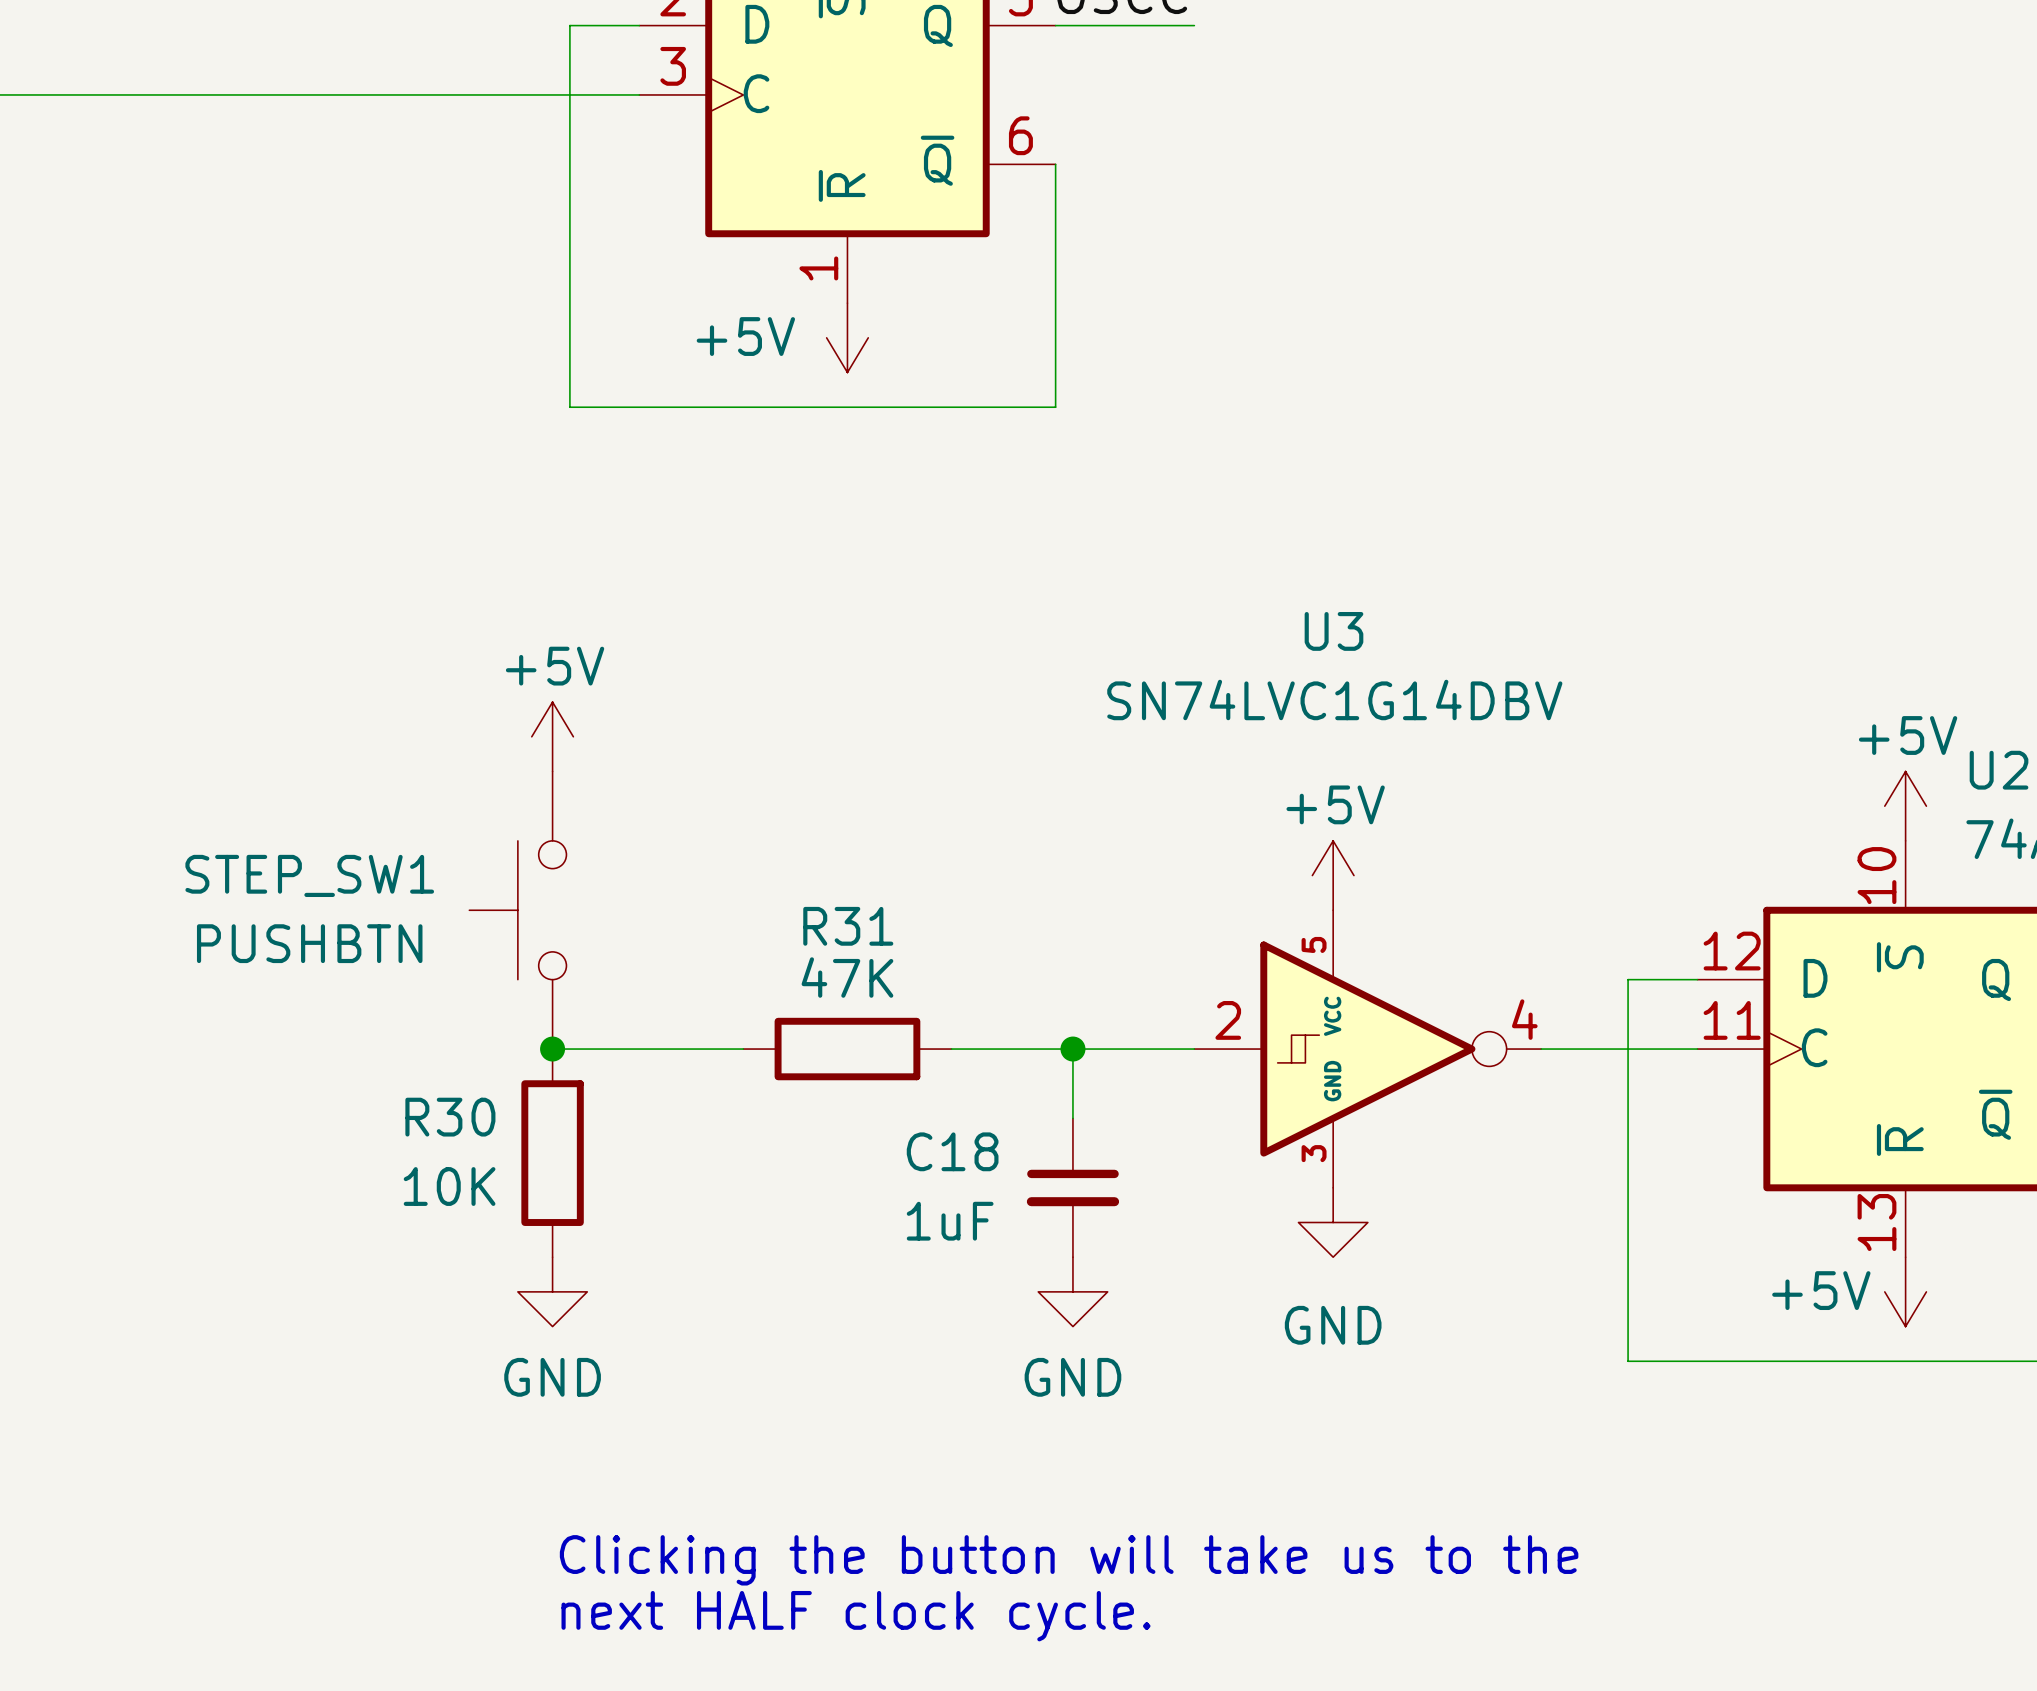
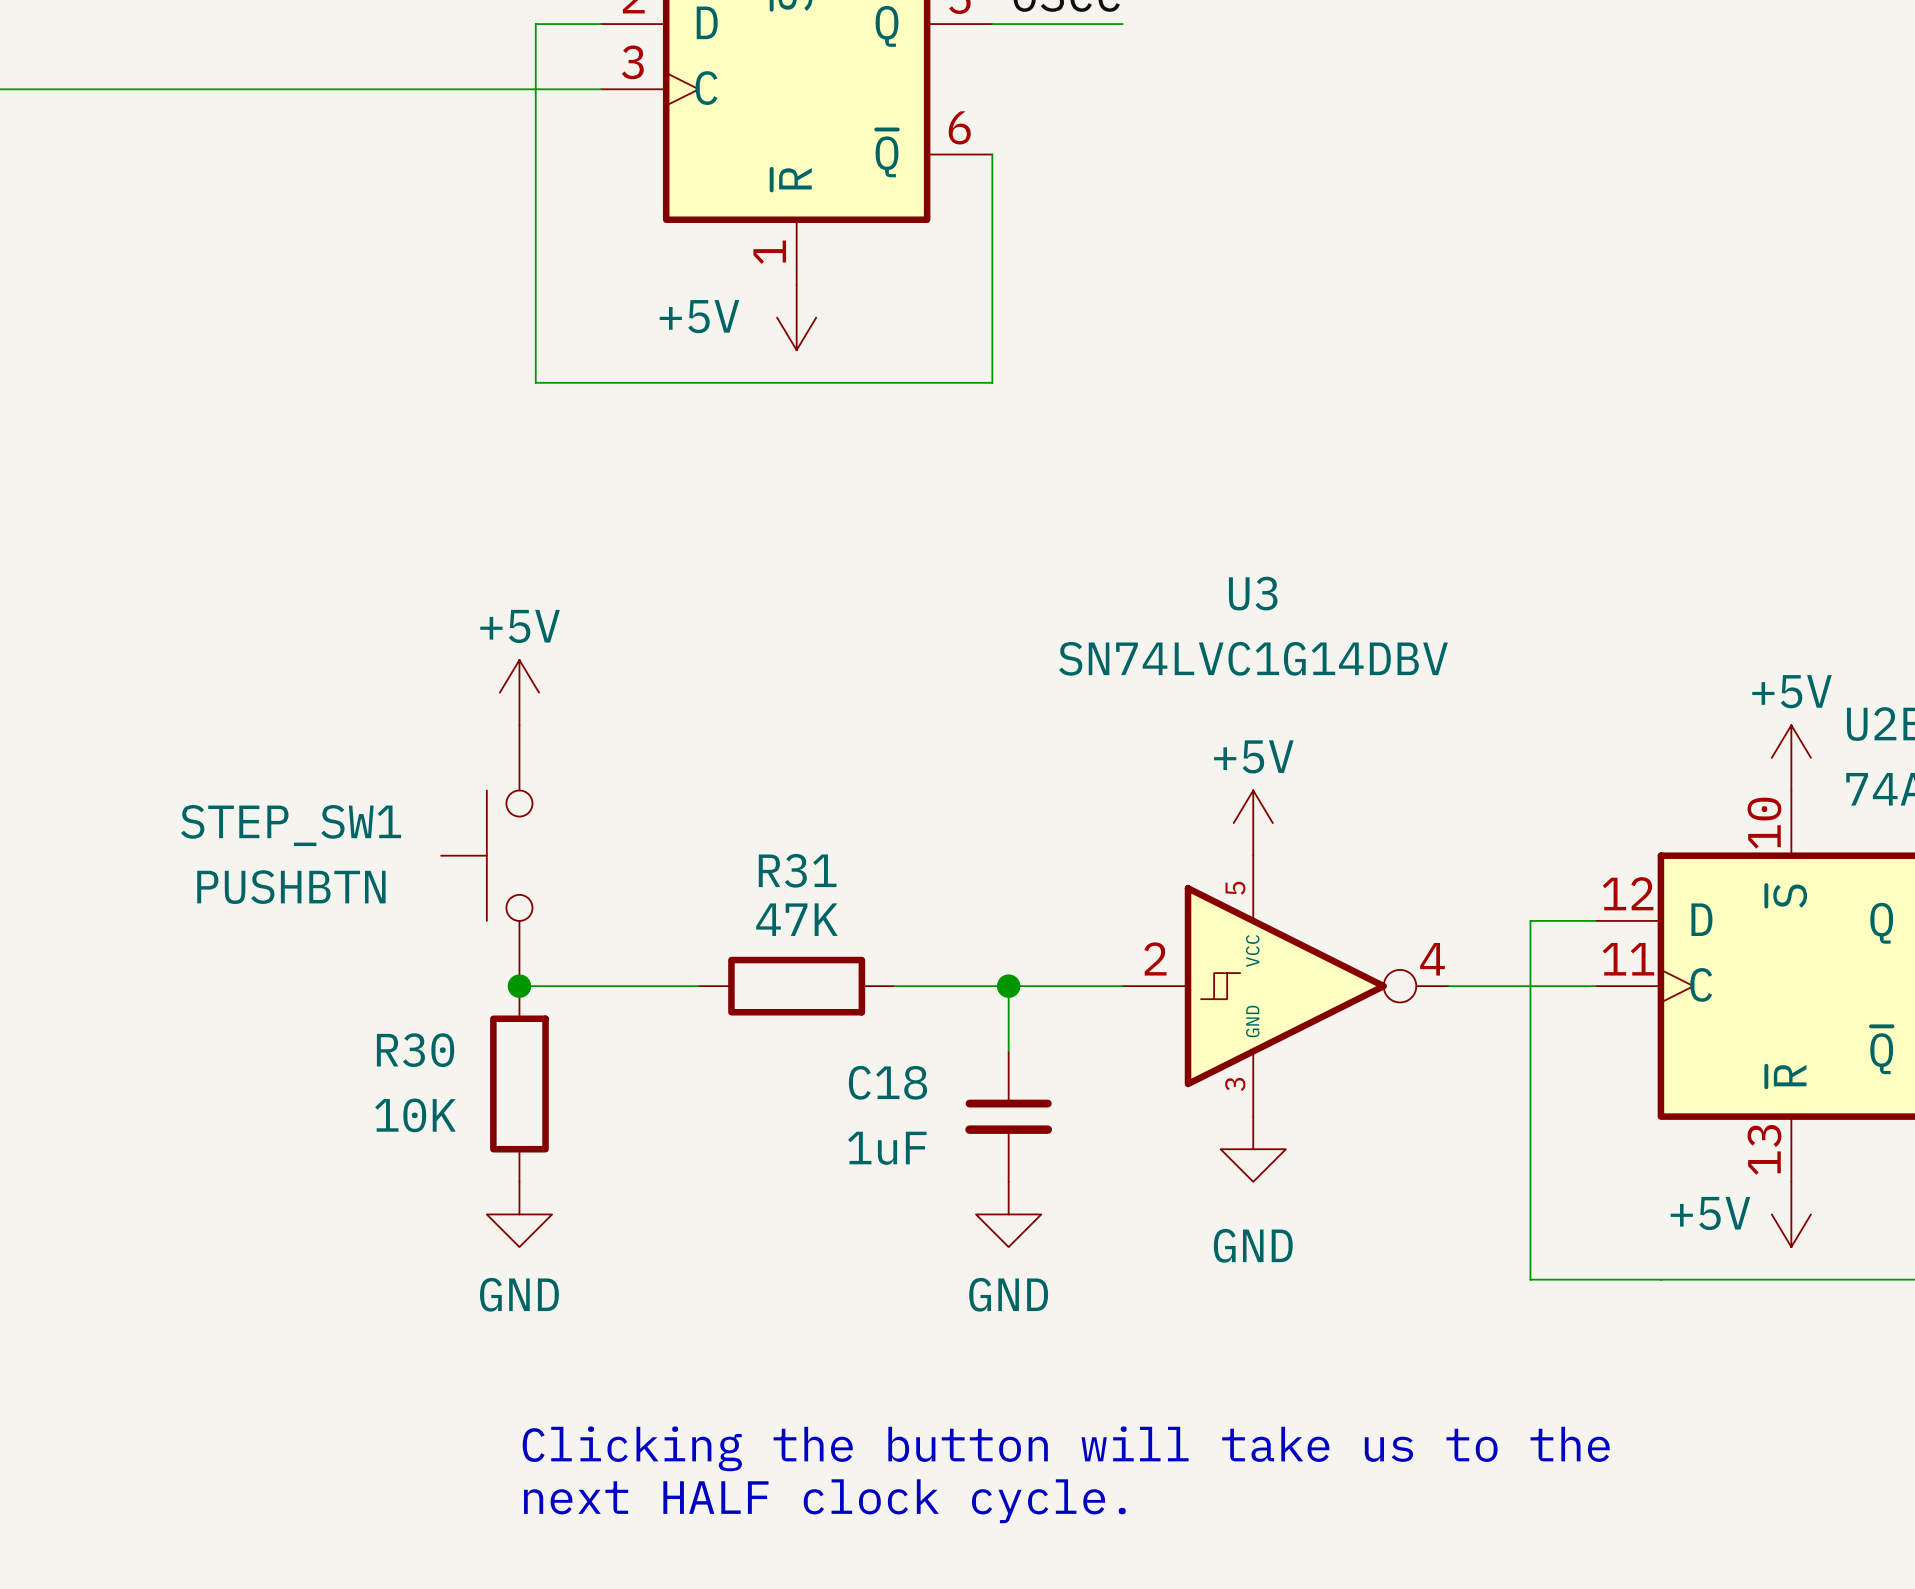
text position: Clicking the button will take us to the (1069, 1560) -> Clicking the button will take us to the (1066, 1448)
text position: next HALF clock cycle. (855, 1616) -> next HALF clock cycle. (824, 1501)

